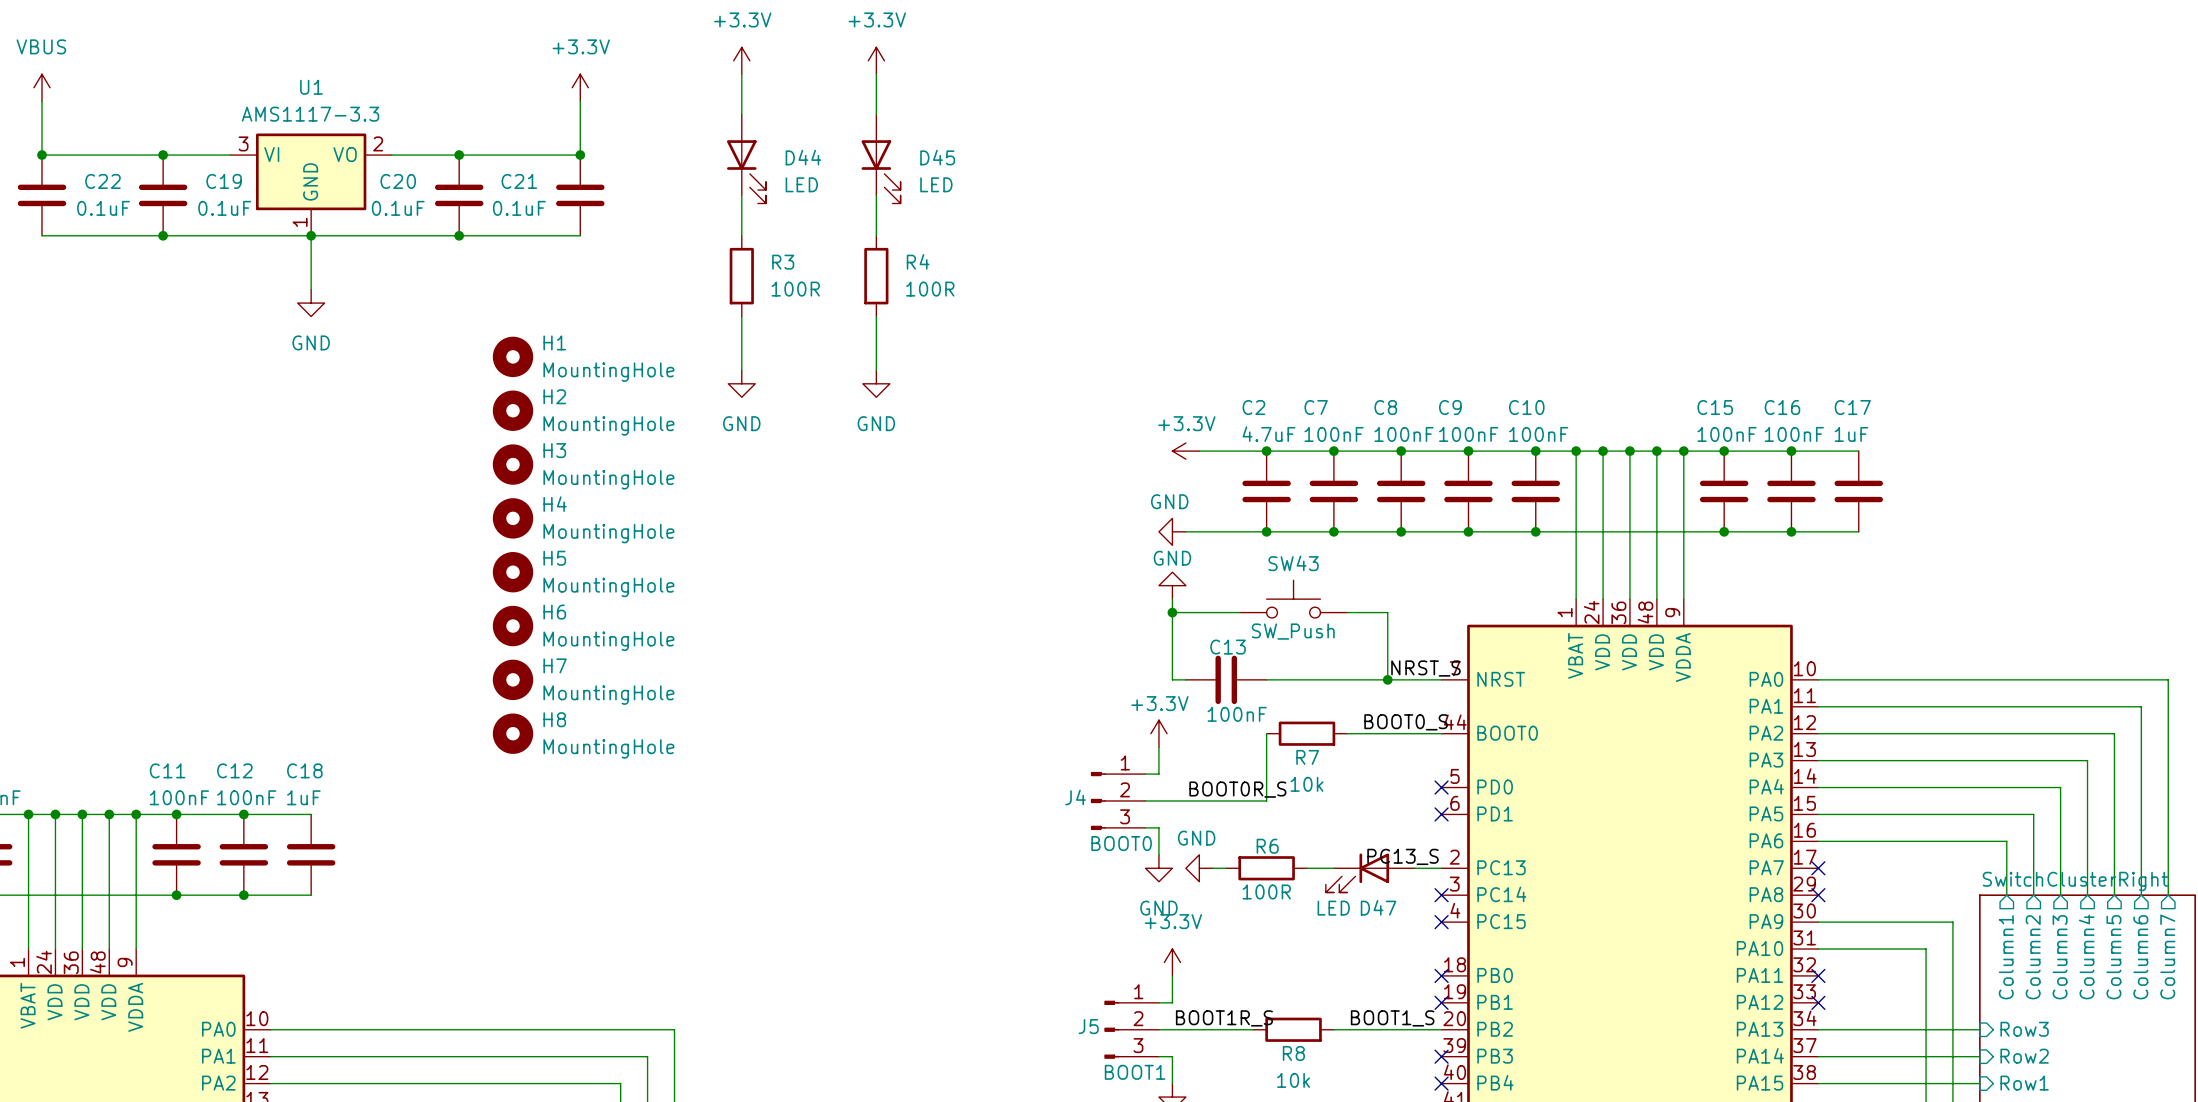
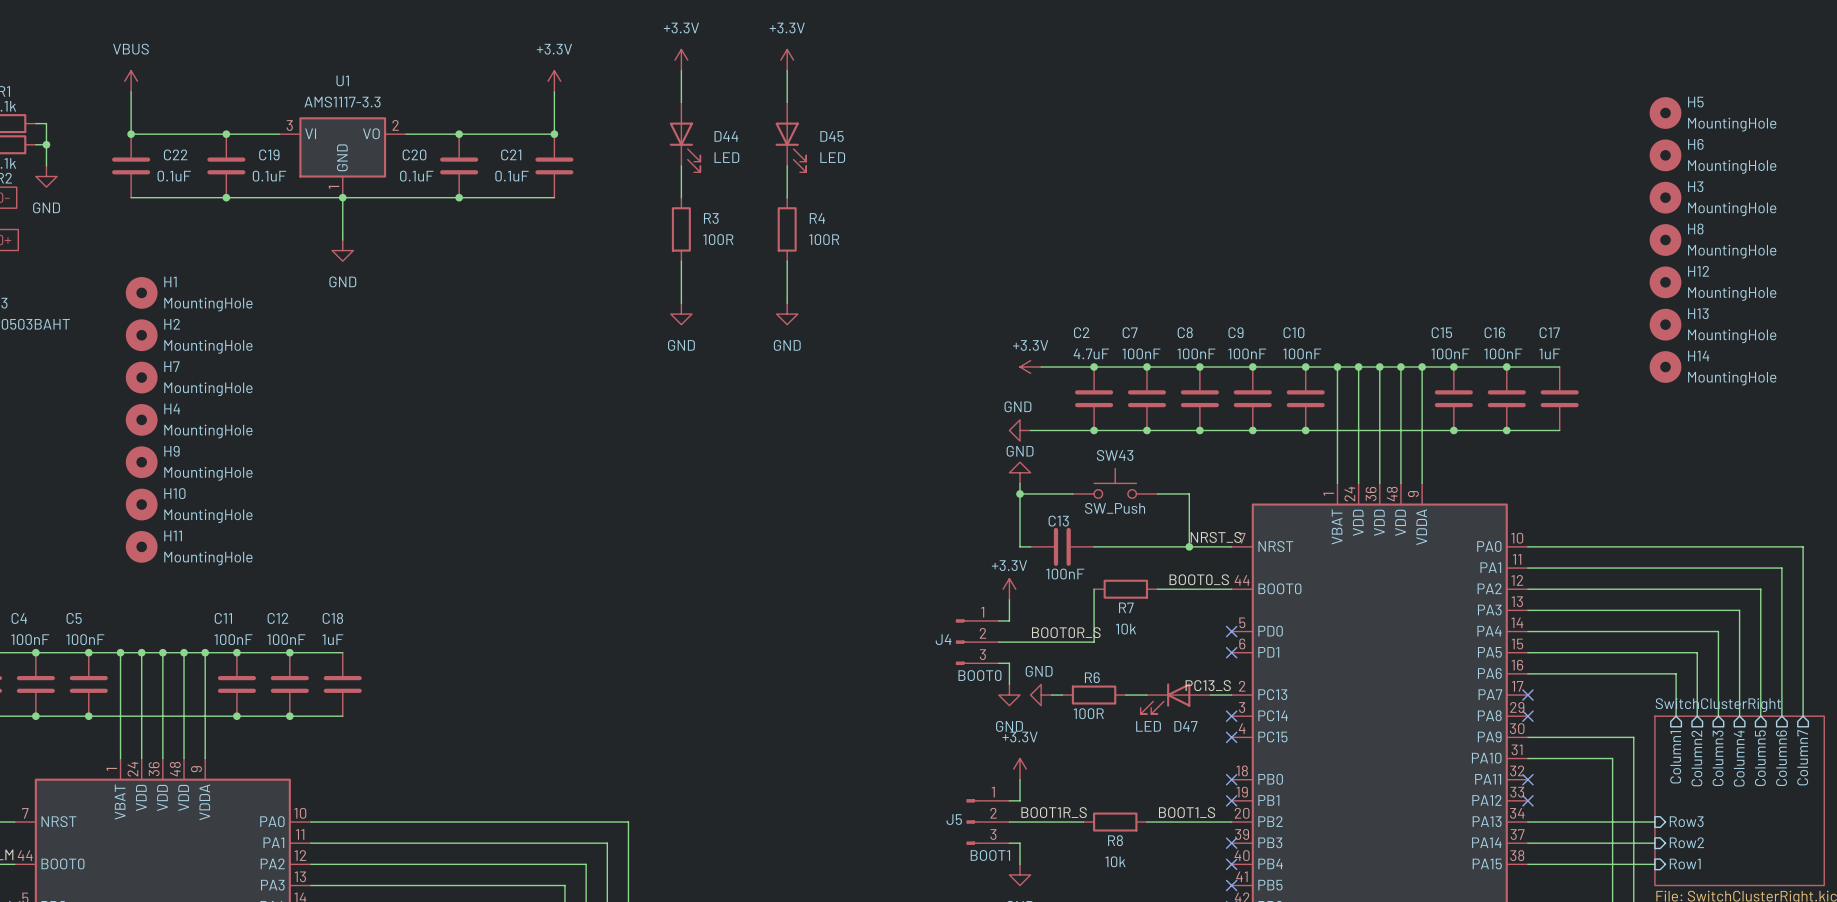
H12: none -> MountingHole (1665, 282)
H1 position: (513, 356) -> (141, 292)
H13: none -> MountingHole (1665, 324)
H2 position: (513, 410) -> (141, 335)
H14: none -> MountingHole (1665, 366)
H3 position: (513, 464) -> (1665, 197)
H4 position: (513, 518) -> (141, 419)
H9: none -> MountingHole (141, 462)
H5 position: (513, 572) -> (1665, 113)
H10: none -> MountingHole (141, 504)
H6 position: (513, 626) -> (1665, 155)
H11: none -> MountingHole (141, 546)
H7 position: (513, 679) -> (141, 377)
H8 position: (513, 733) -> (1665, 240)

